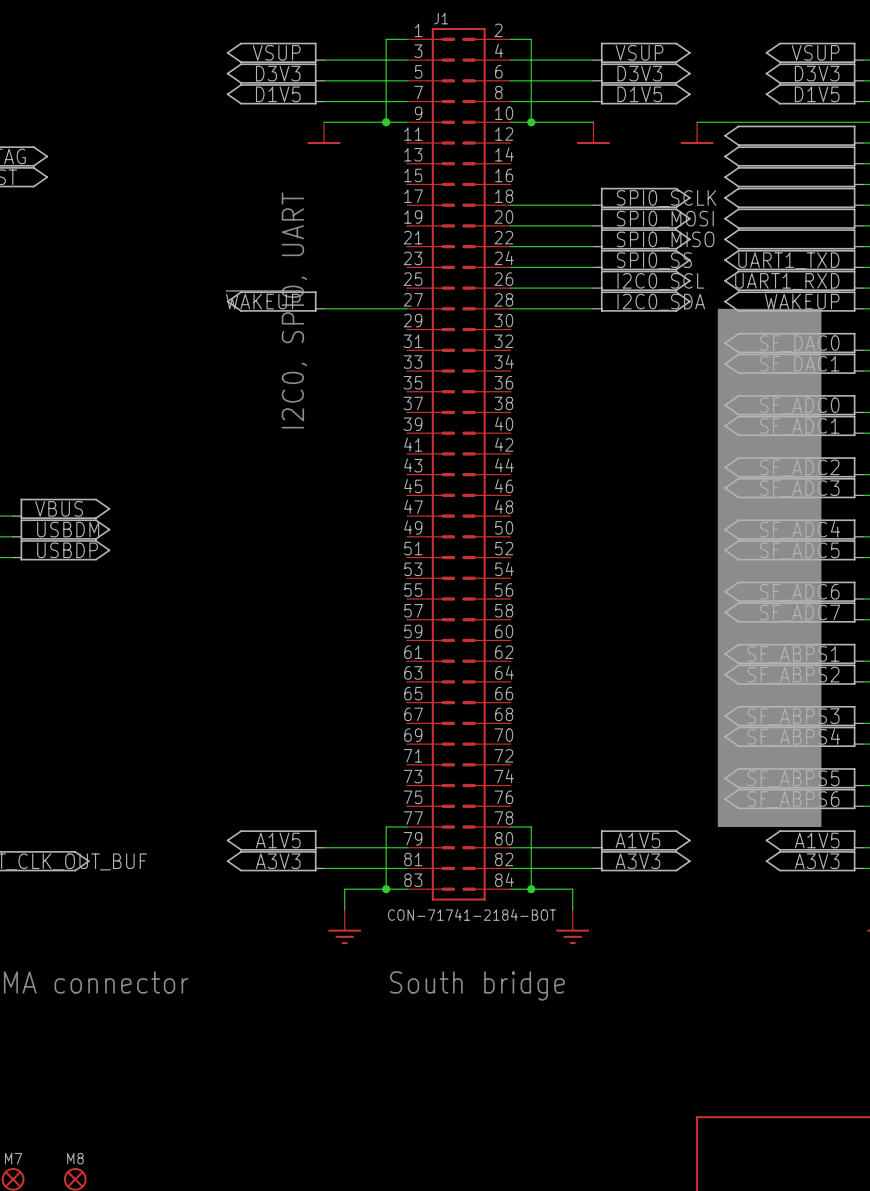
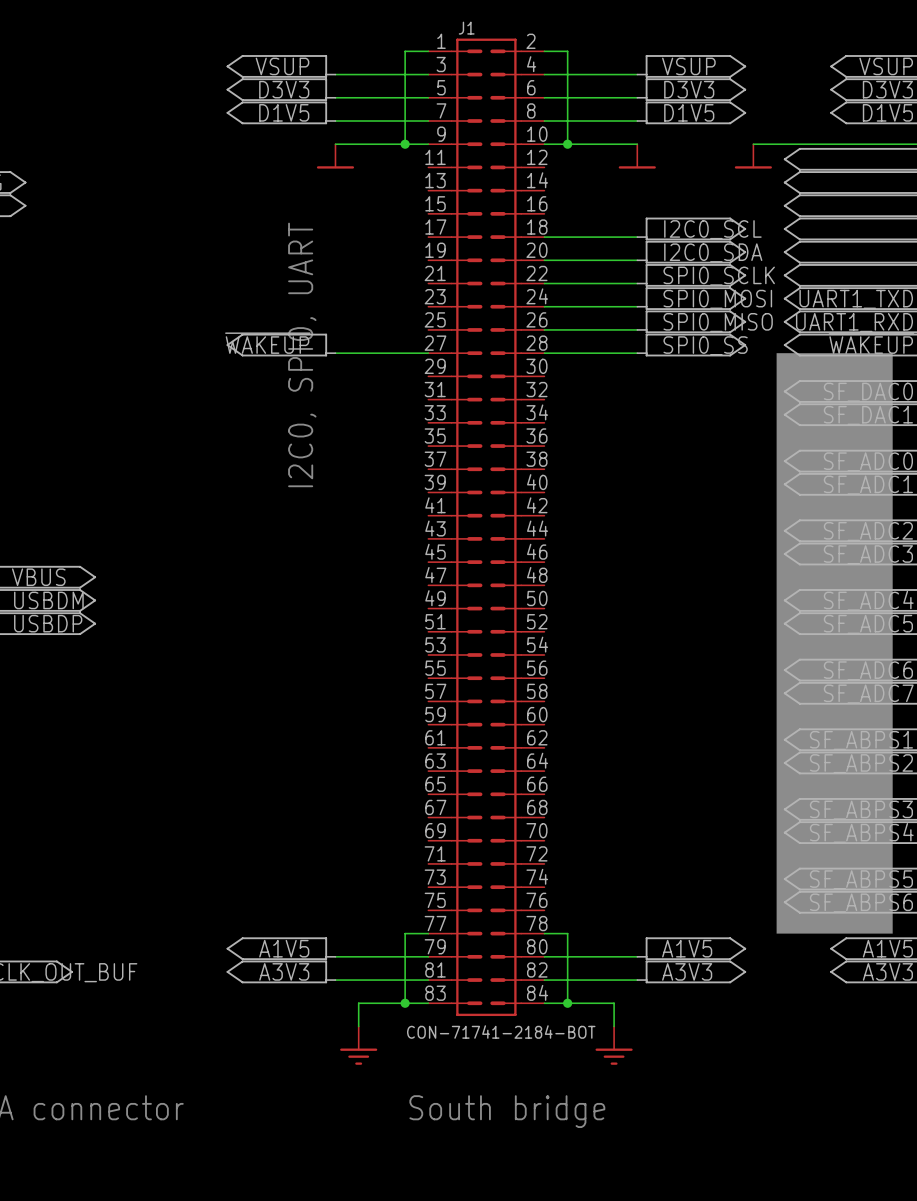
label: SPI0_SCLK (666, 198) -> I2C0_SCL (712, 229)
label: SPI0_MOSI (665, 219) -> I2C0_SDA (713, 252)
label: SPI0_MISO (665, 240) -> SPI0_SCLK (719, 276)
label: SPI0_SS (654, 260) -> SPI0_MOSI (717, 299)
label: I2C0_SCL (660, 281) -> SPI0_MISO (718, 322)
label: I2C0_SDA (661, 302) -> SPI0_SS (705, 345)

